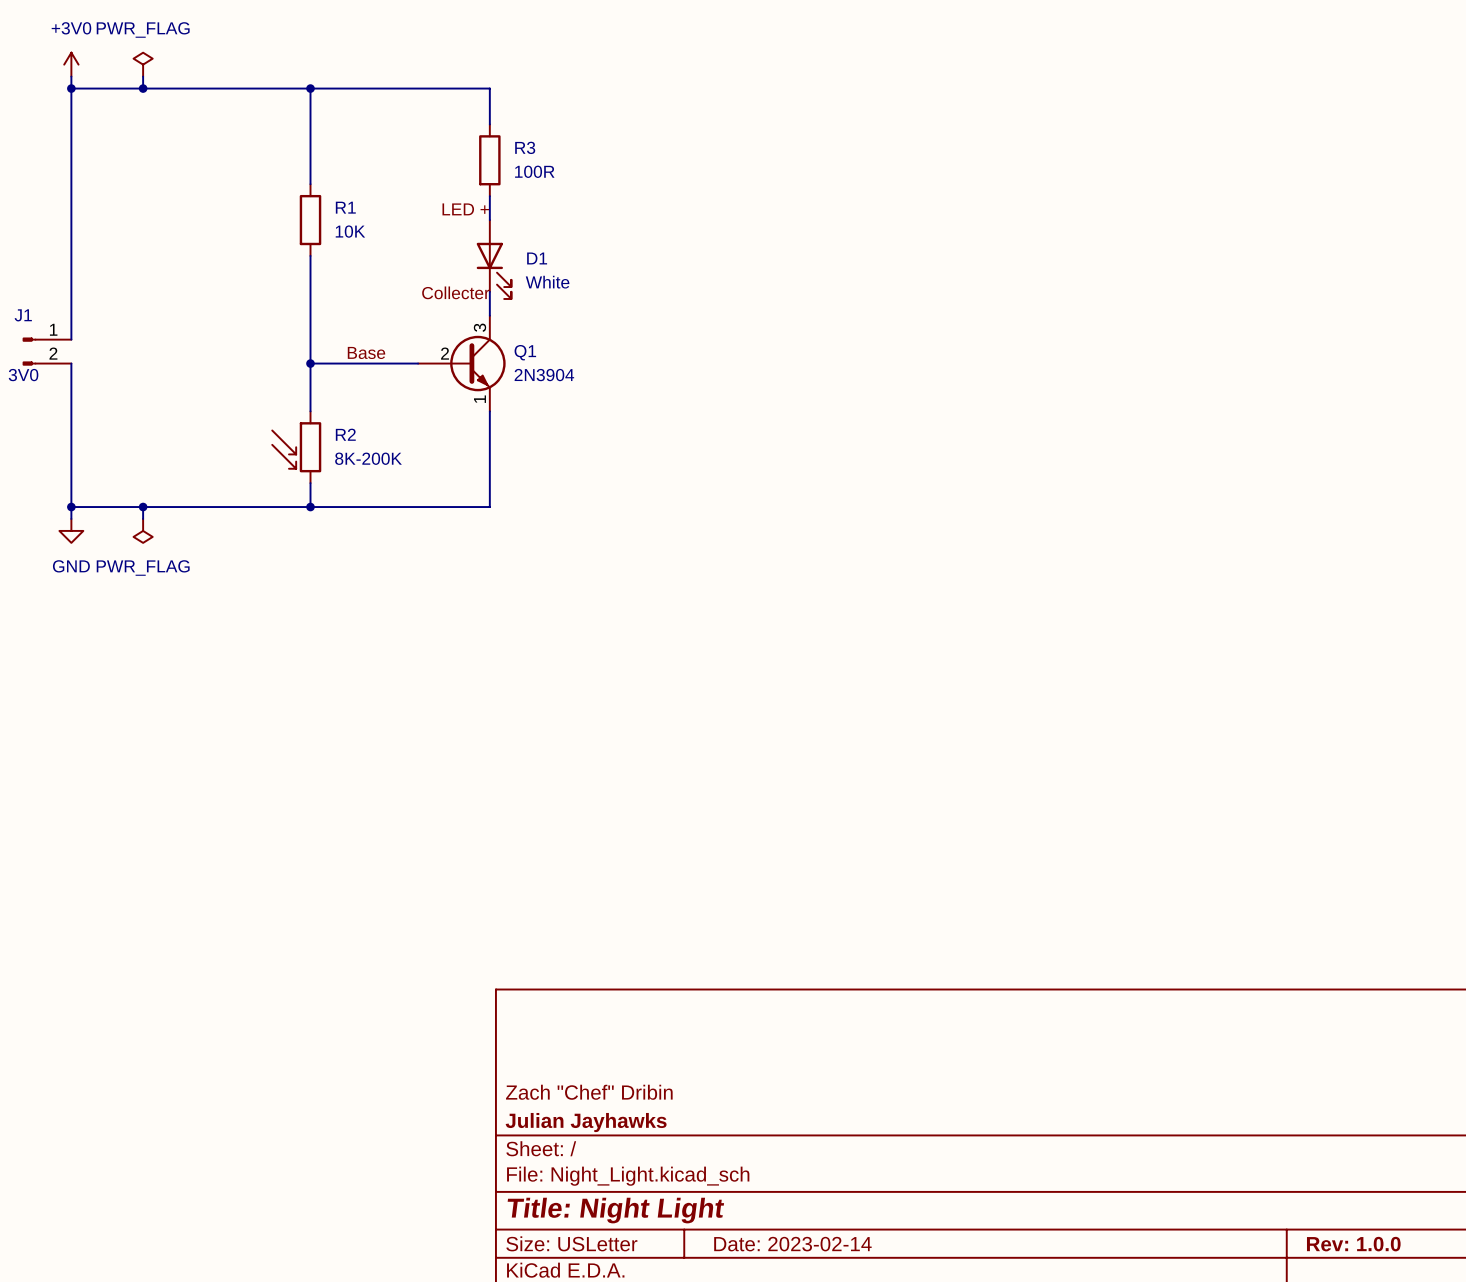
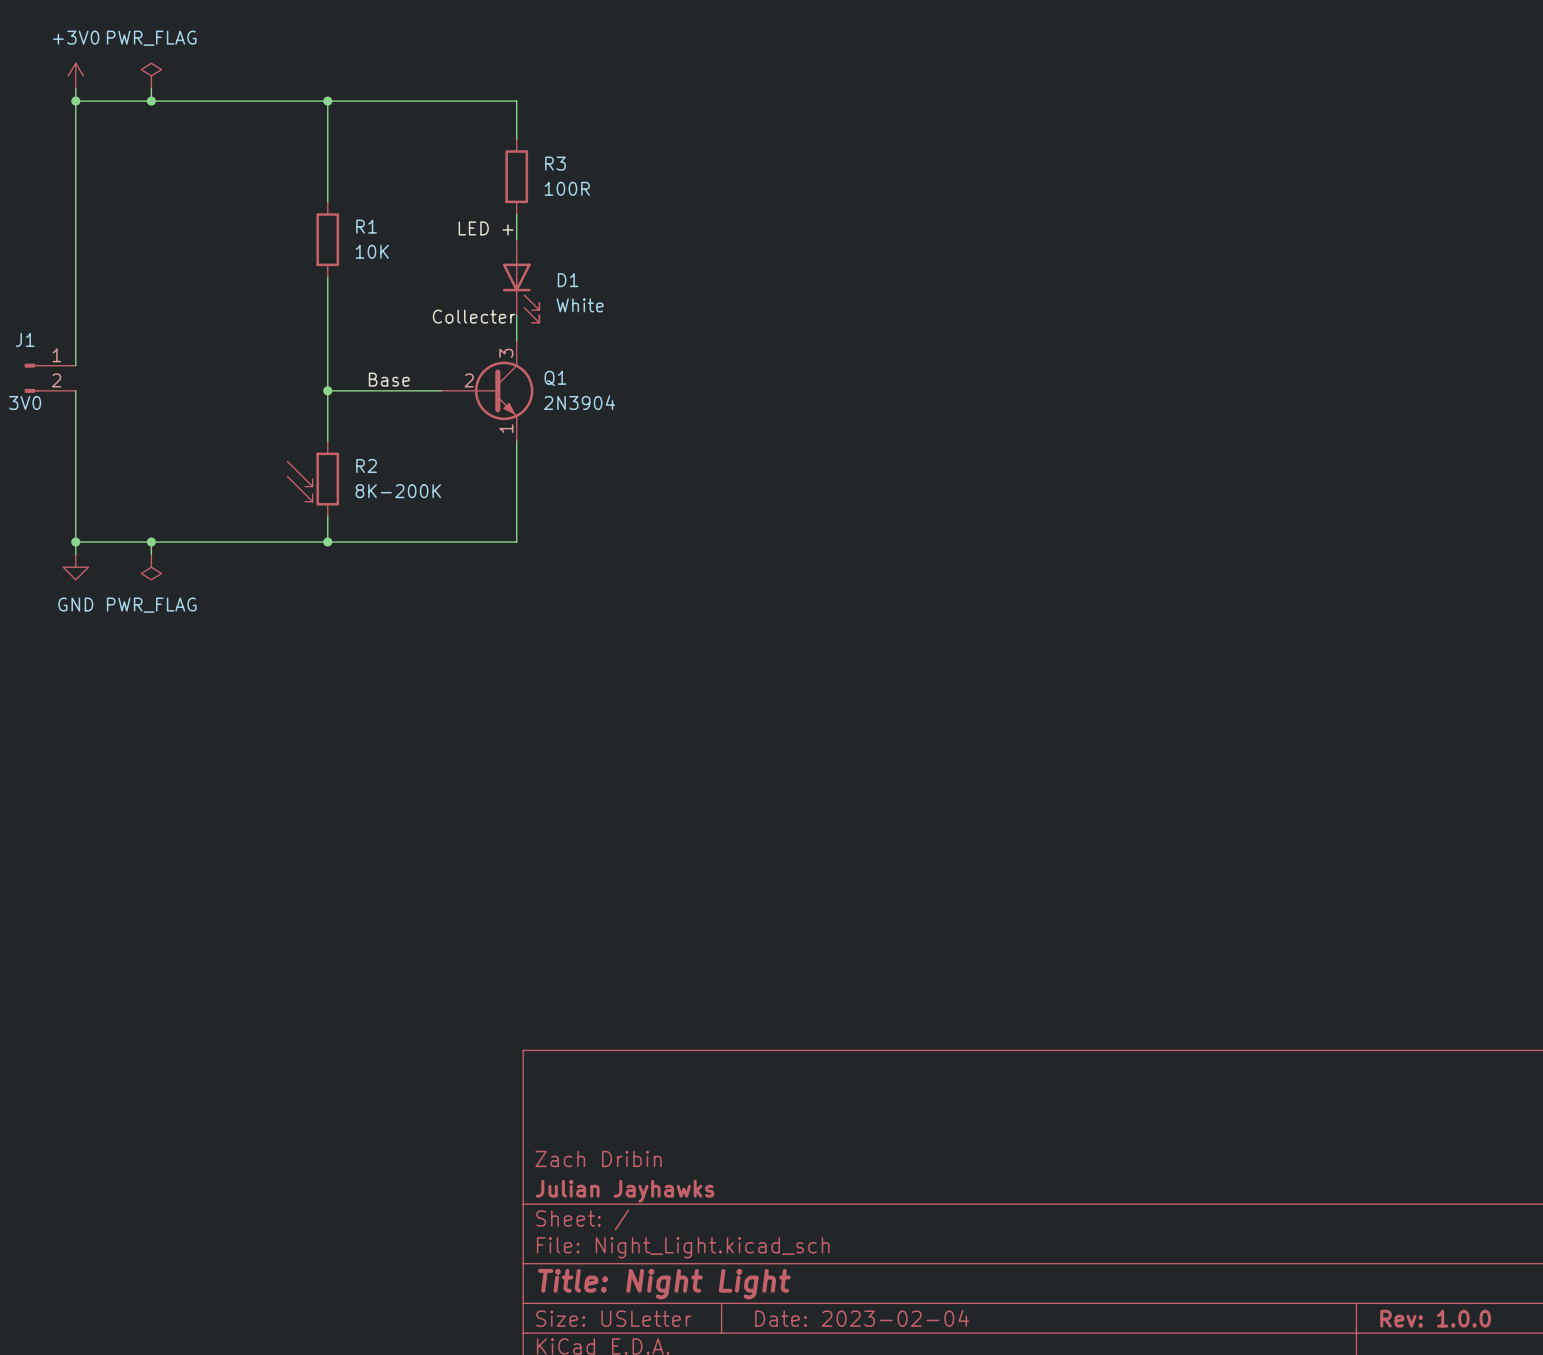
title block: Zach "Chef" Dribin (589, 1092) -> Zach Dribin (598, 1158)
title block: Date: 2023-02-14 (792, 1244) -> Date: 2023-02-04 (862, 1318)

